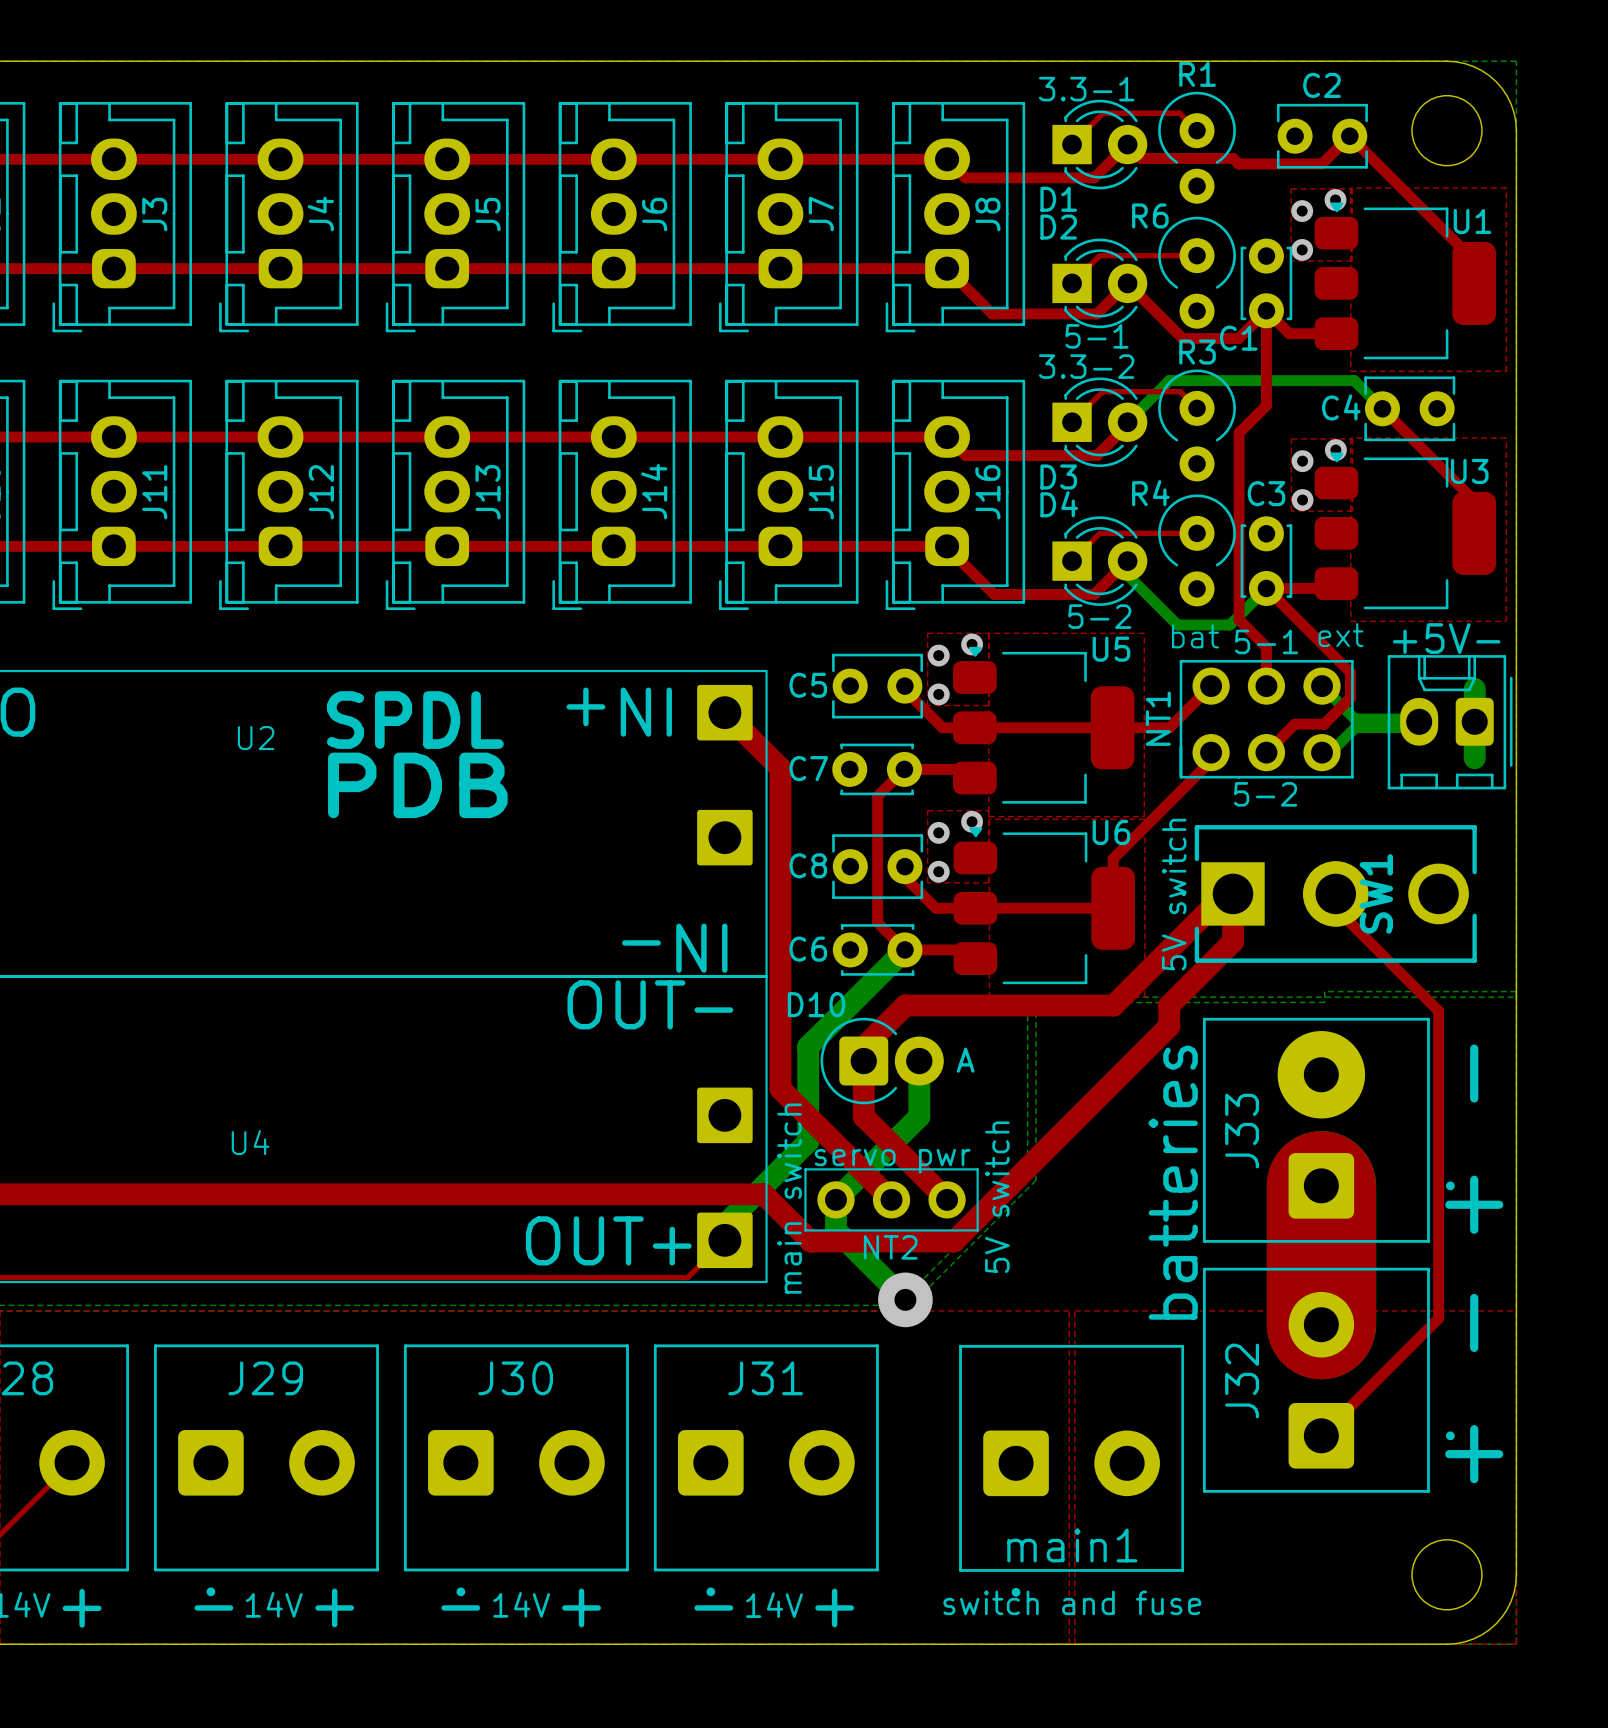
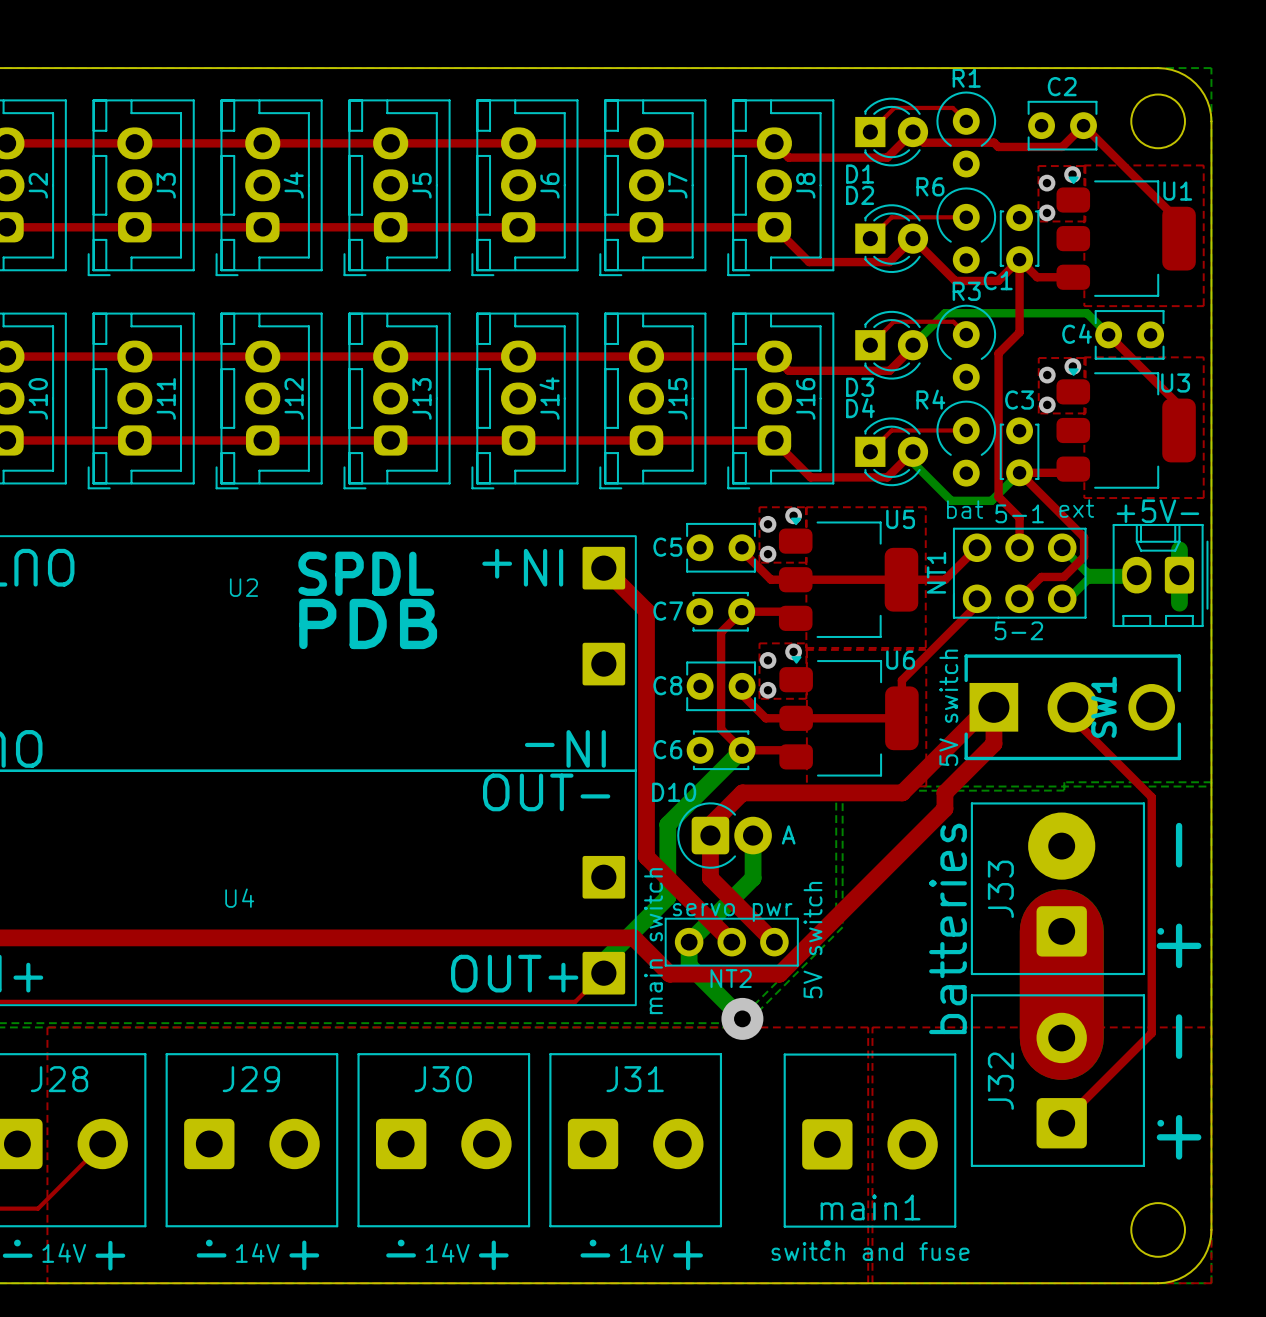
text: 3.3-1 (1086, 89) -> none
text: 5-1 (1096, 336) -> none
text: 3.3-2 (1086, 366) -> none
text: 5-2 (1099, 616) -> none

